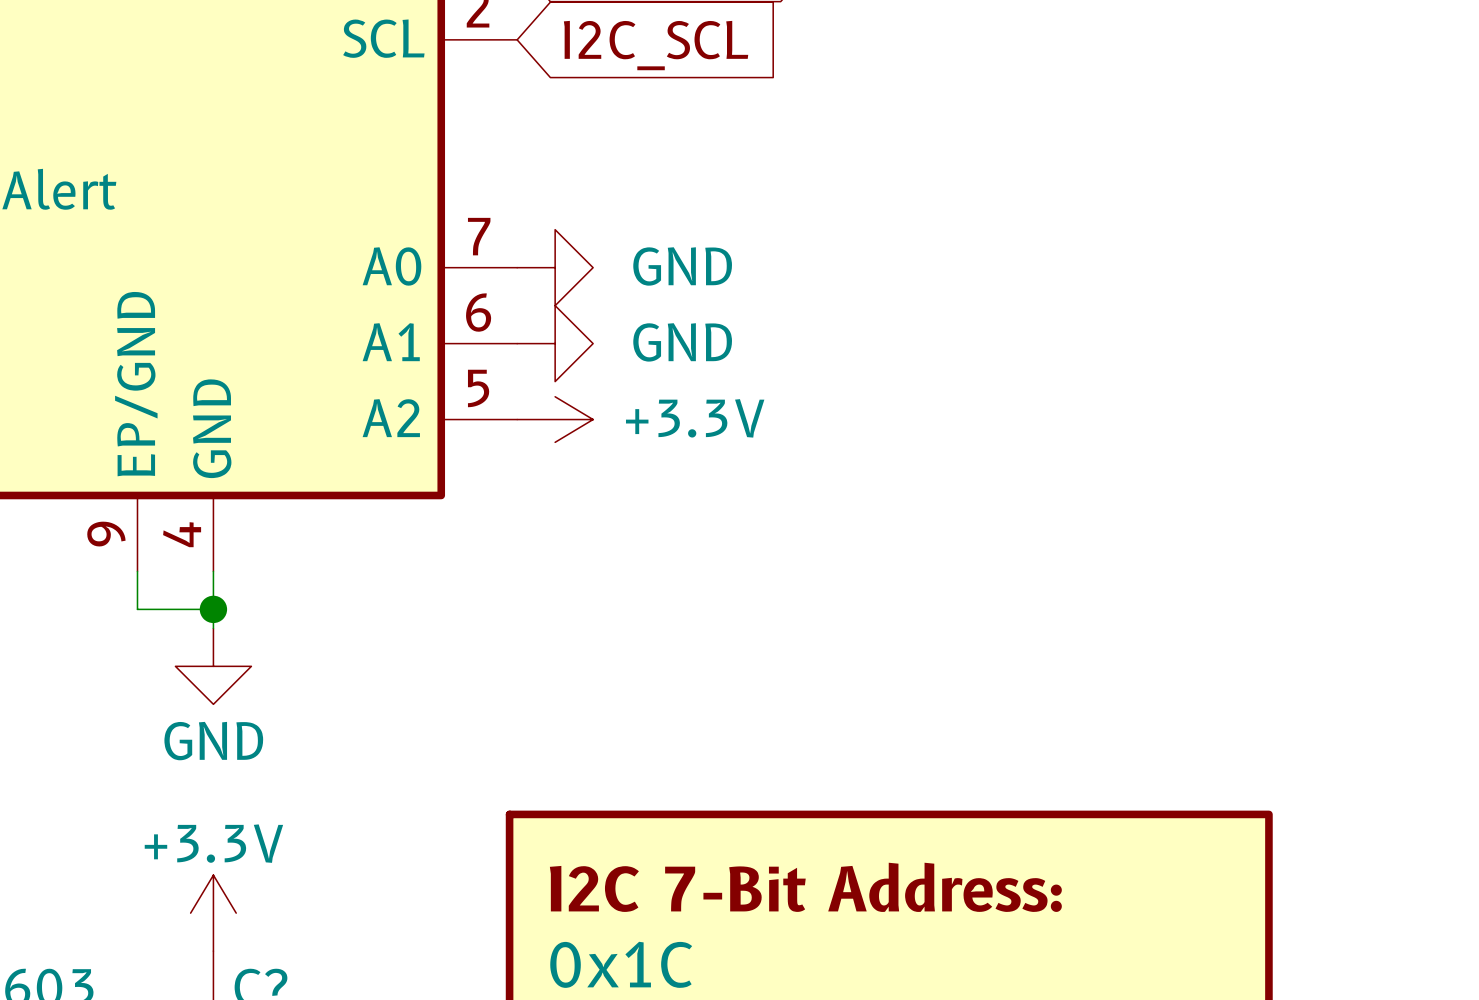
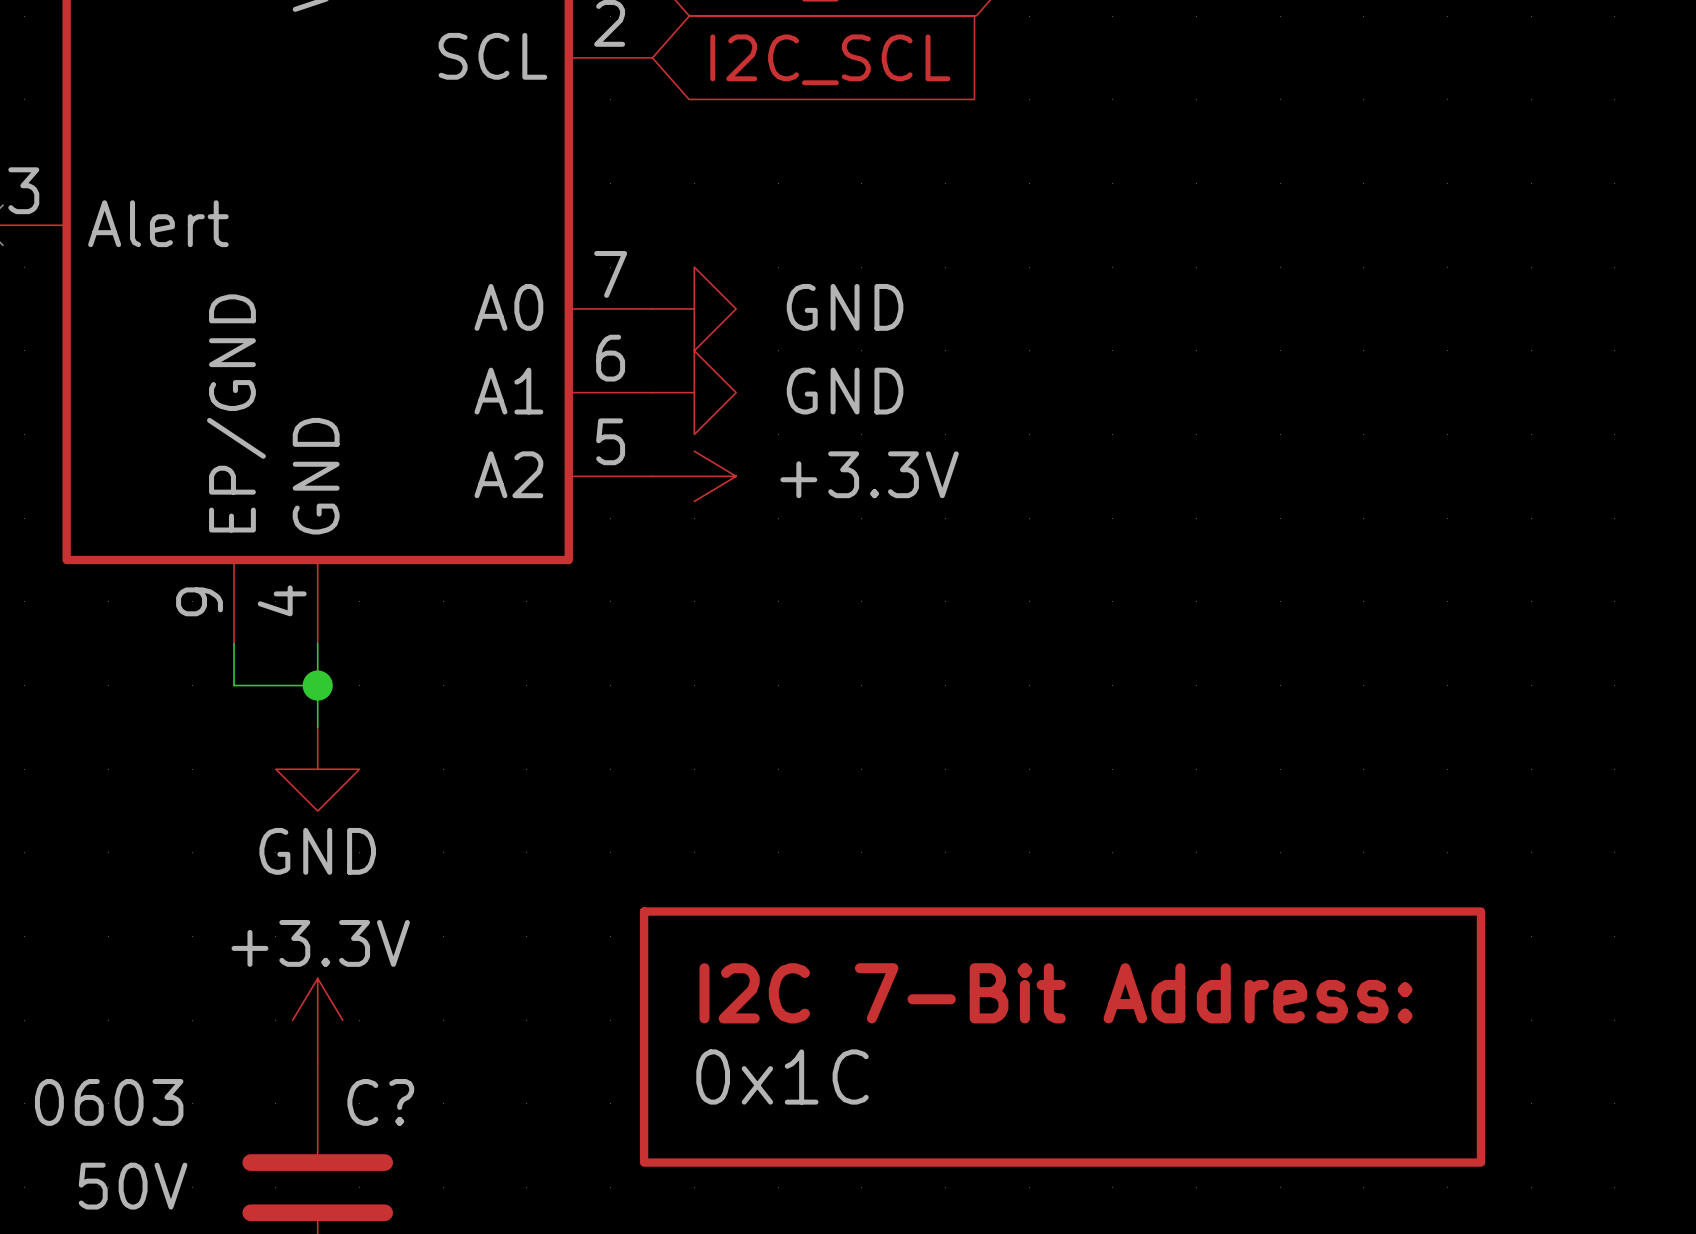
power symbol position: GND (213, 666) -> GND (317, 769)

